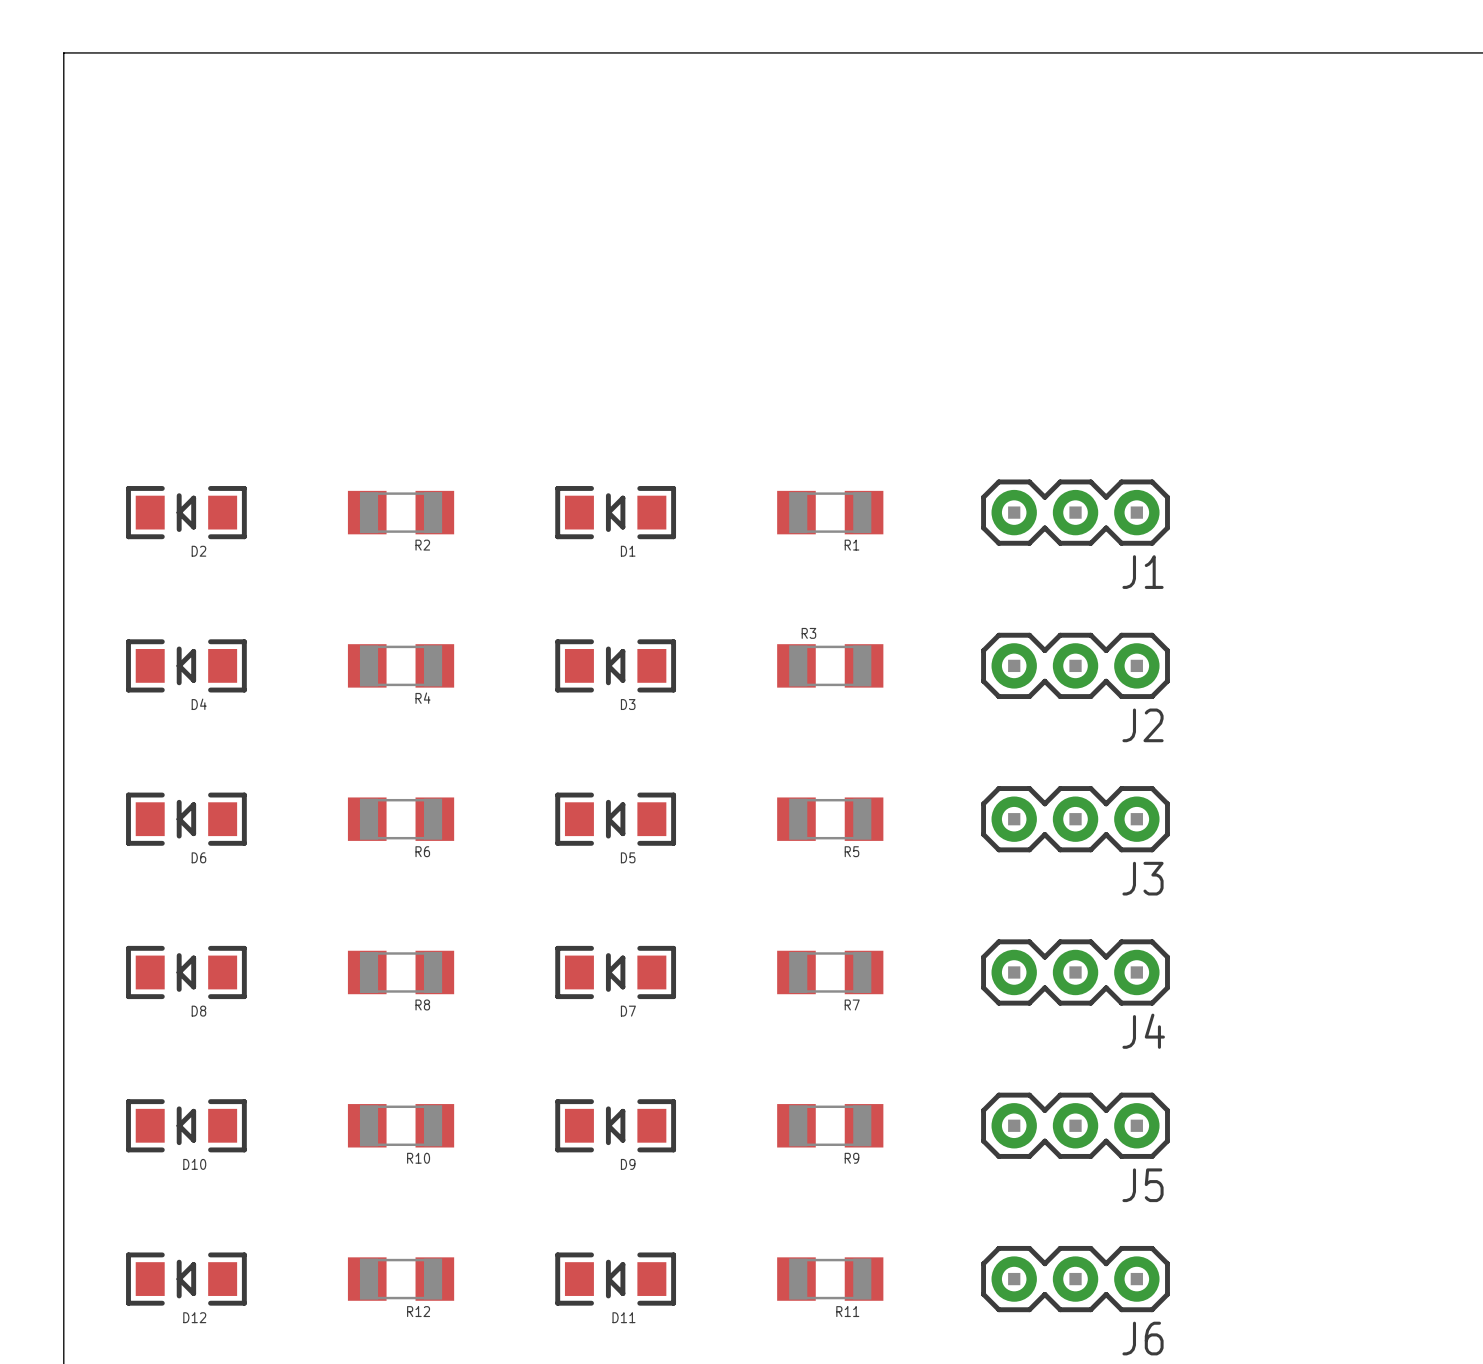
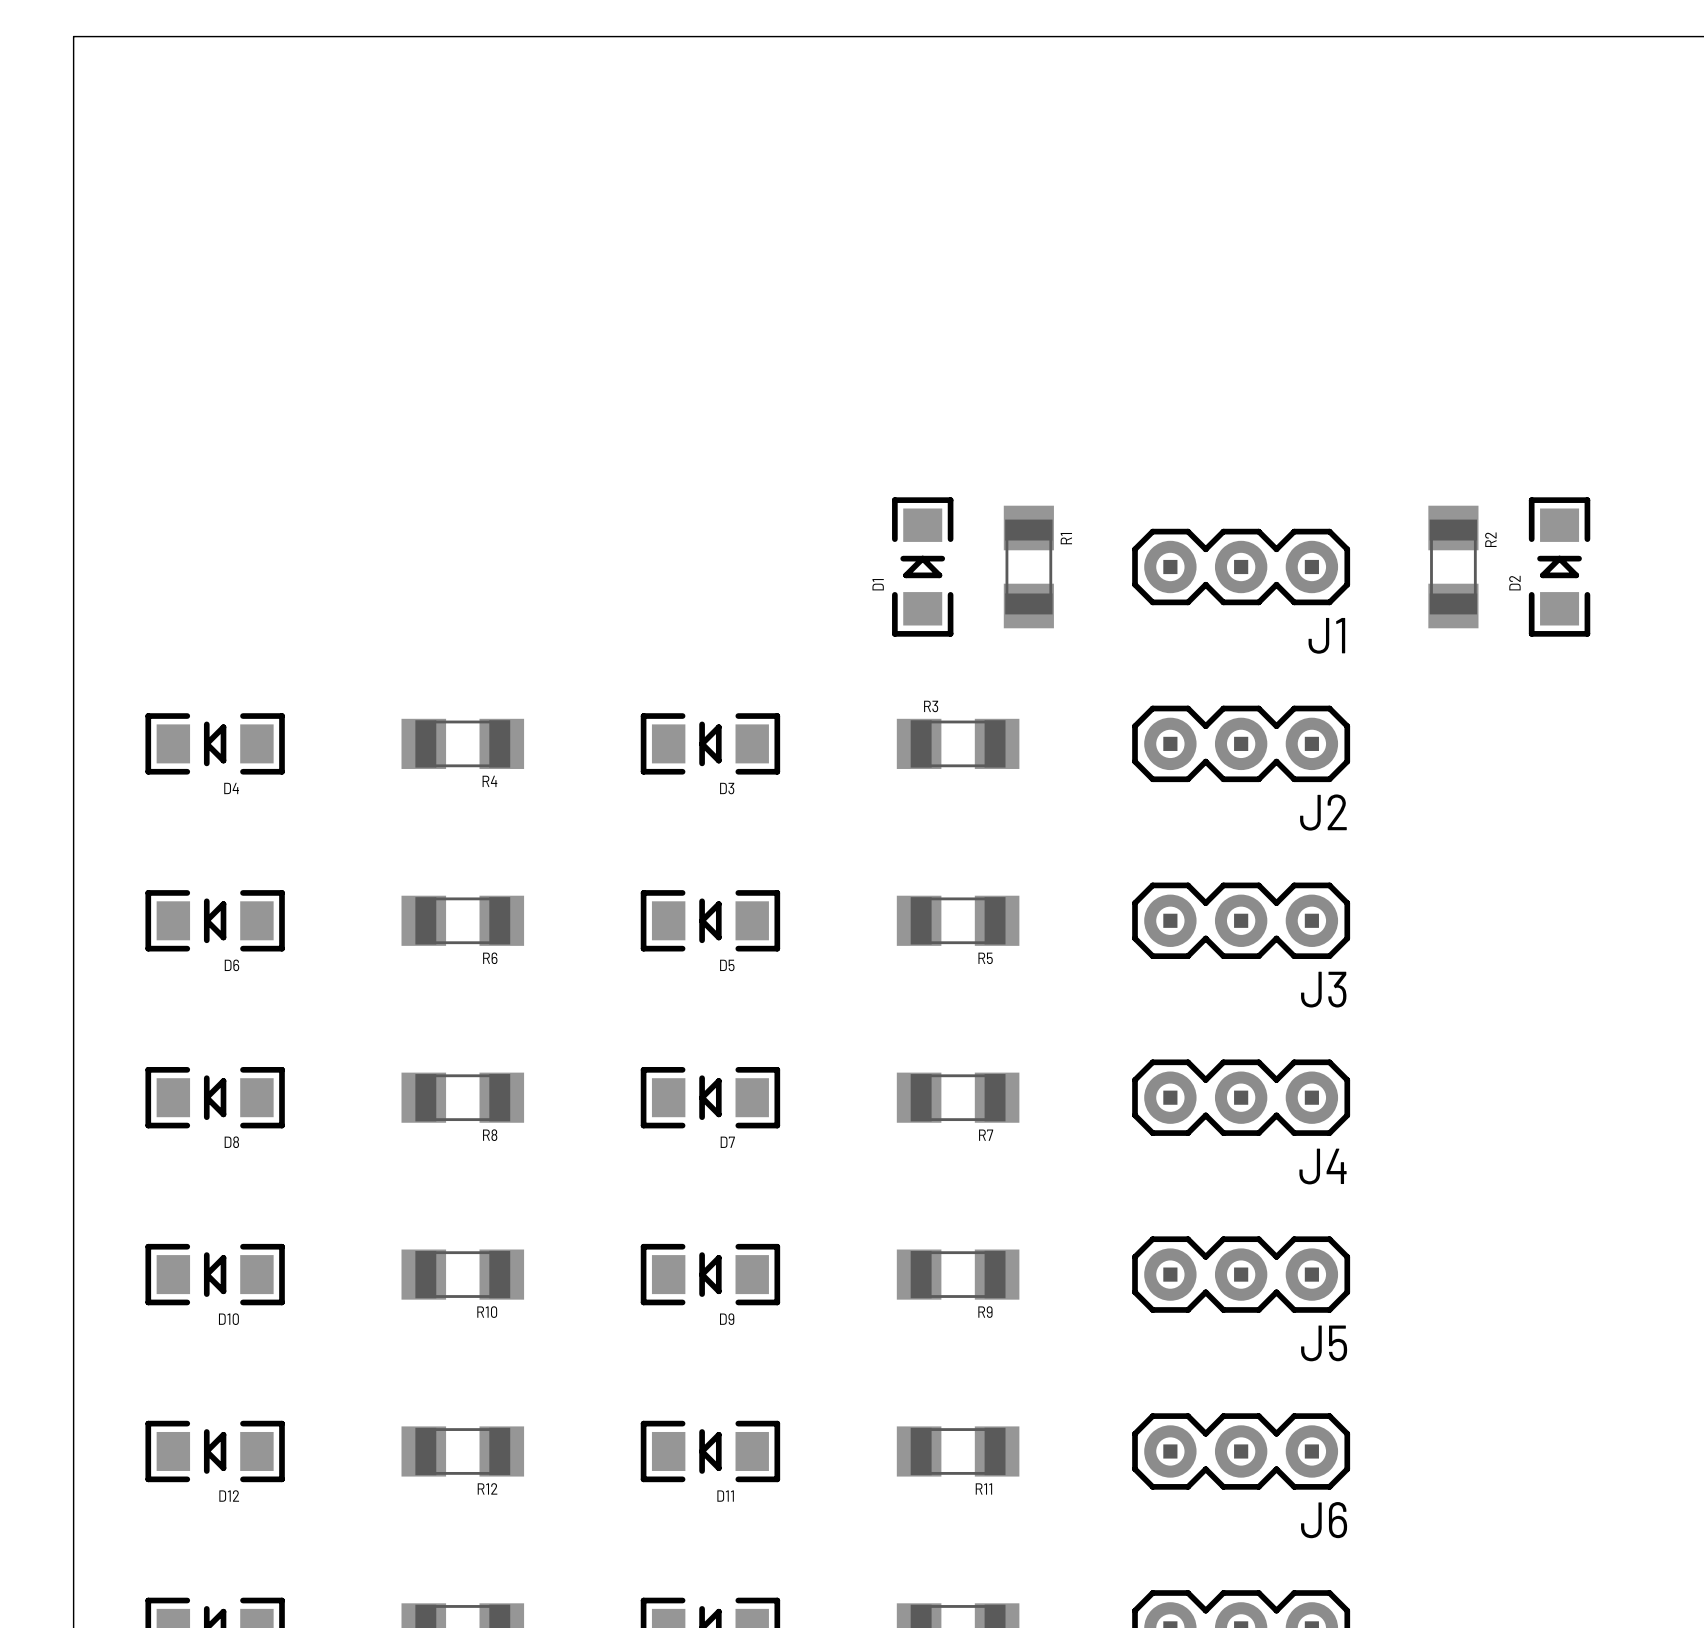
D2 rotation: 0° (186, 512) -> 90° clockwise (1559, 567)
D2 position: (186, 512) -> (1559, 567)
R2 rotation: 0° (401, 512) -> 90° clockwise (1453, 567)
R2 position: (401, 512) -> (1453, 567)
D1 rotation: 0° (615, 512) -> 90° clockwise (922, 567)
D1 position: (615, 512) -> (922, 567)
R1 rotation: 0° (830, 512) -> 90° clockwise (1028, 567)
R2 name position: R2 (422, 545) -> R2 (1490, 539)
R1 name position: R1 (851, 545) -> R1 (1066, 538)

